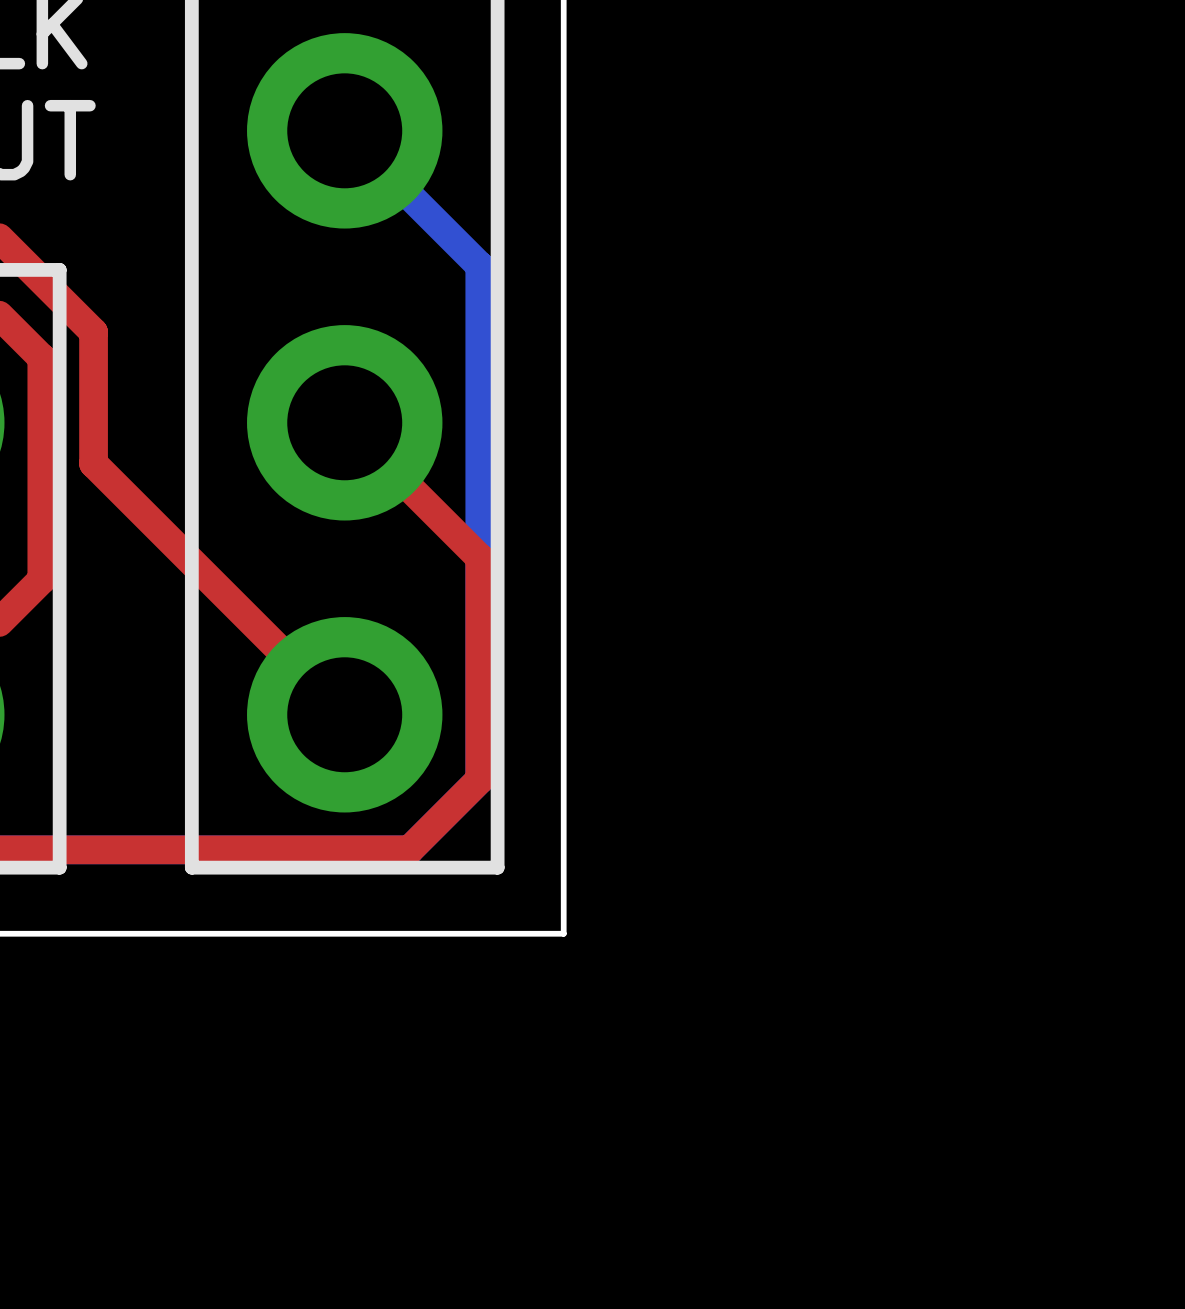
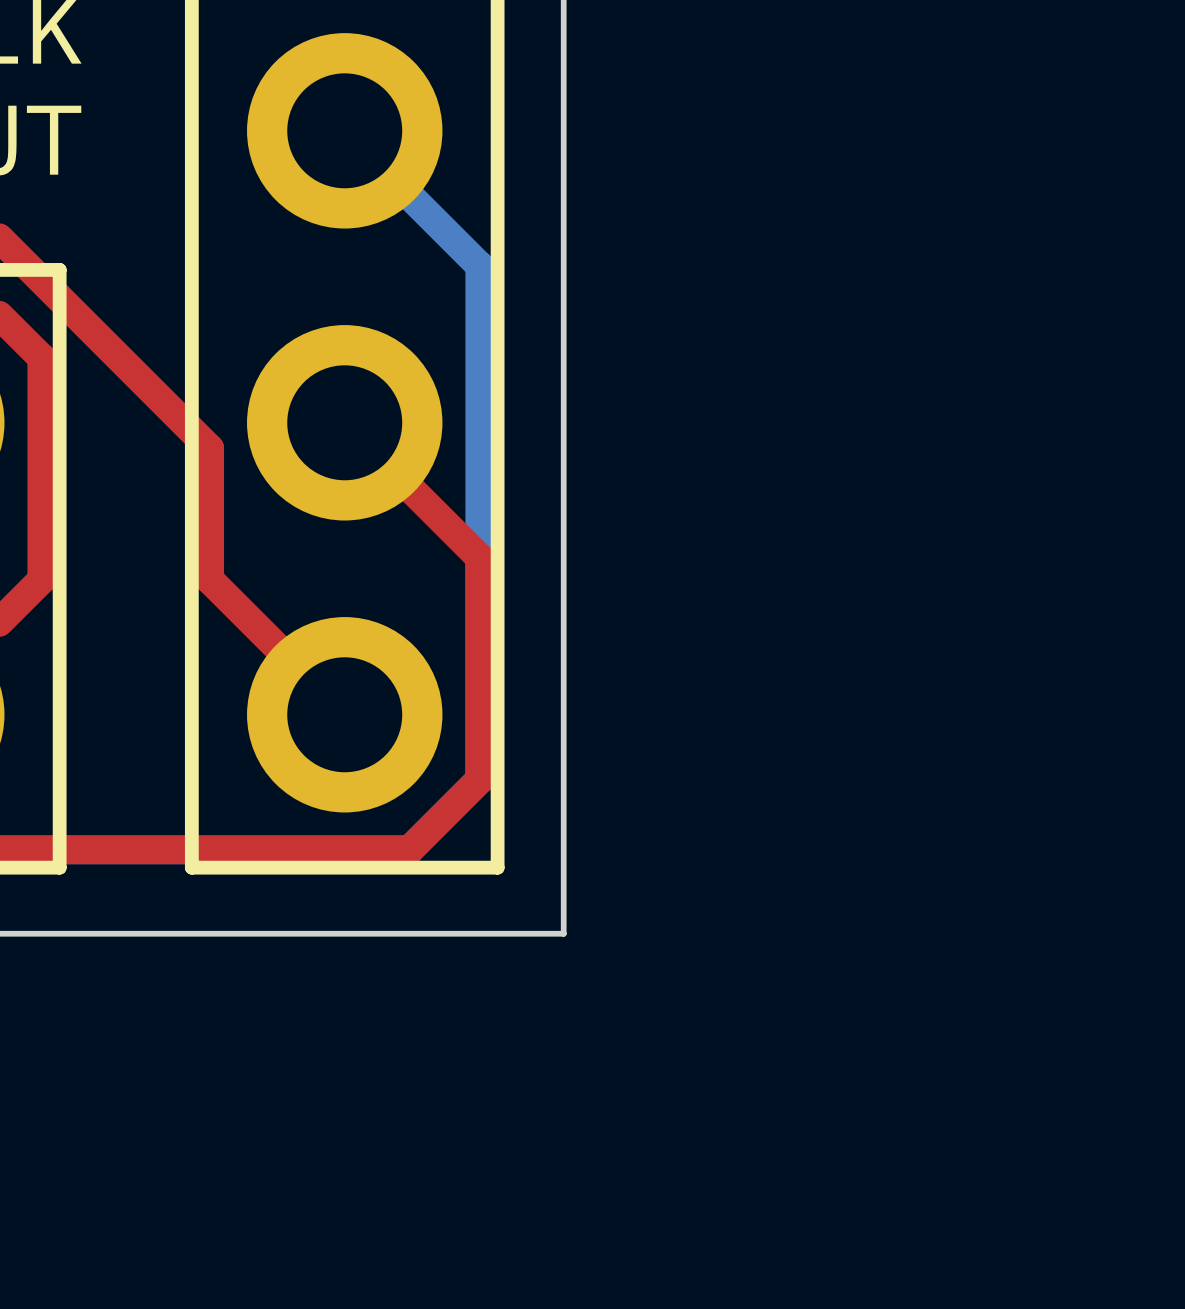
top track: (93, 332) (93, 463) (209, 579) -> (93, 332) (209, 448) (209, 579)

